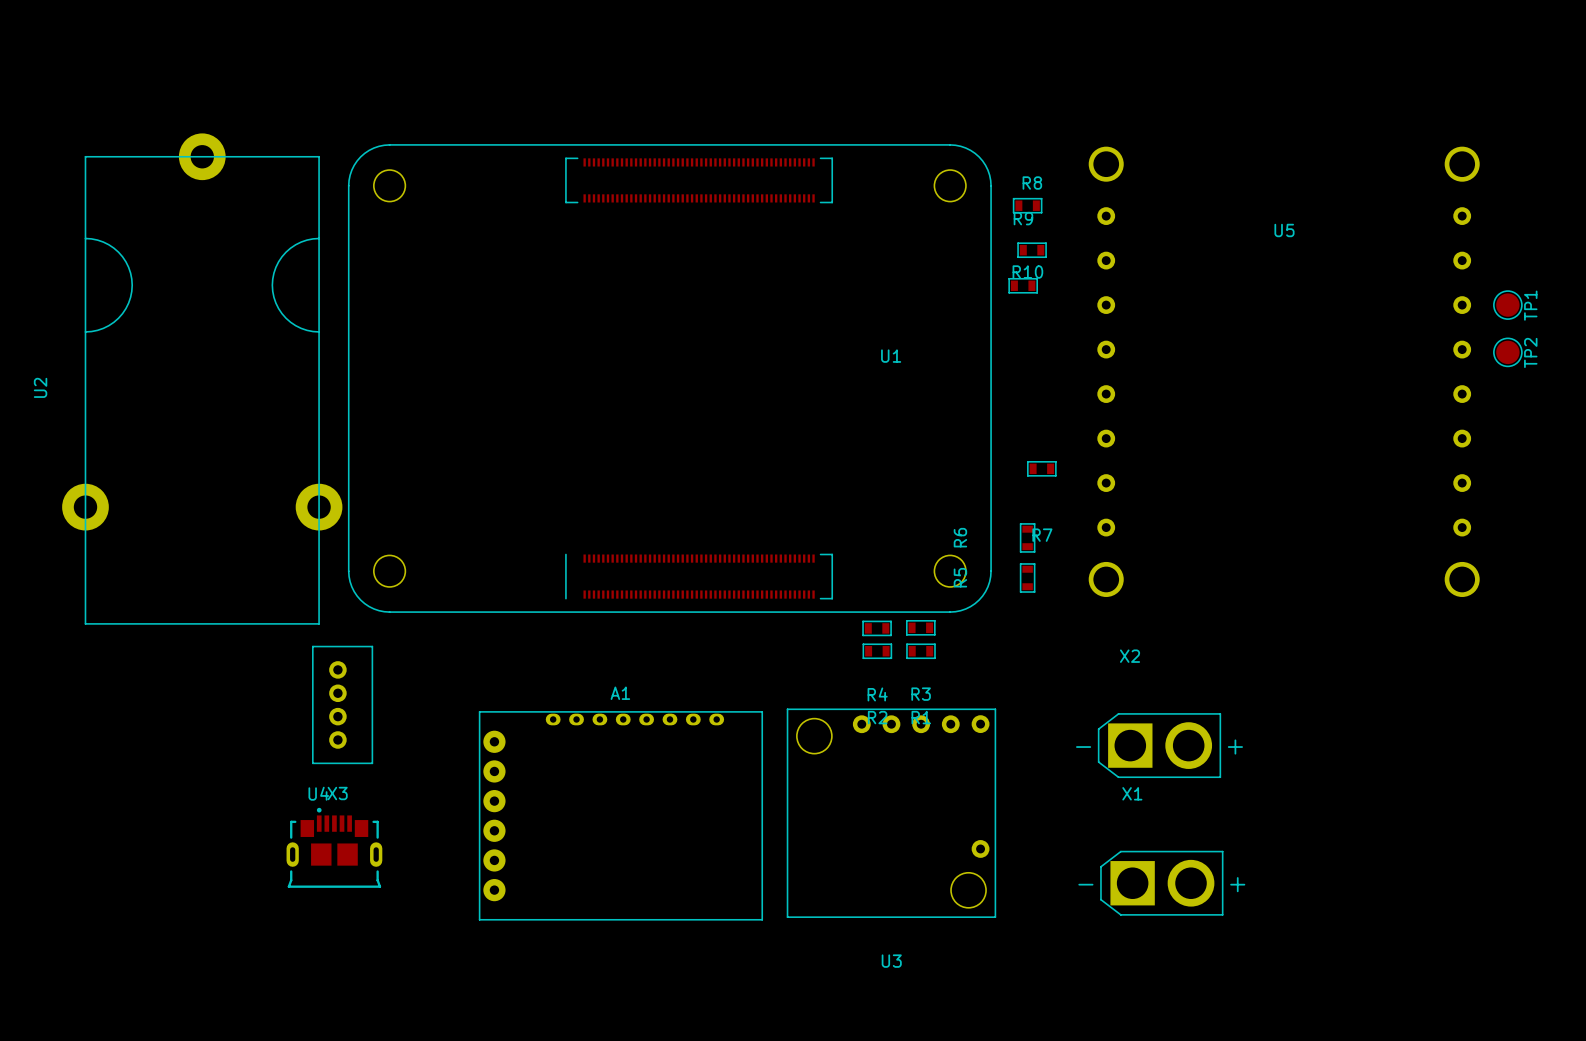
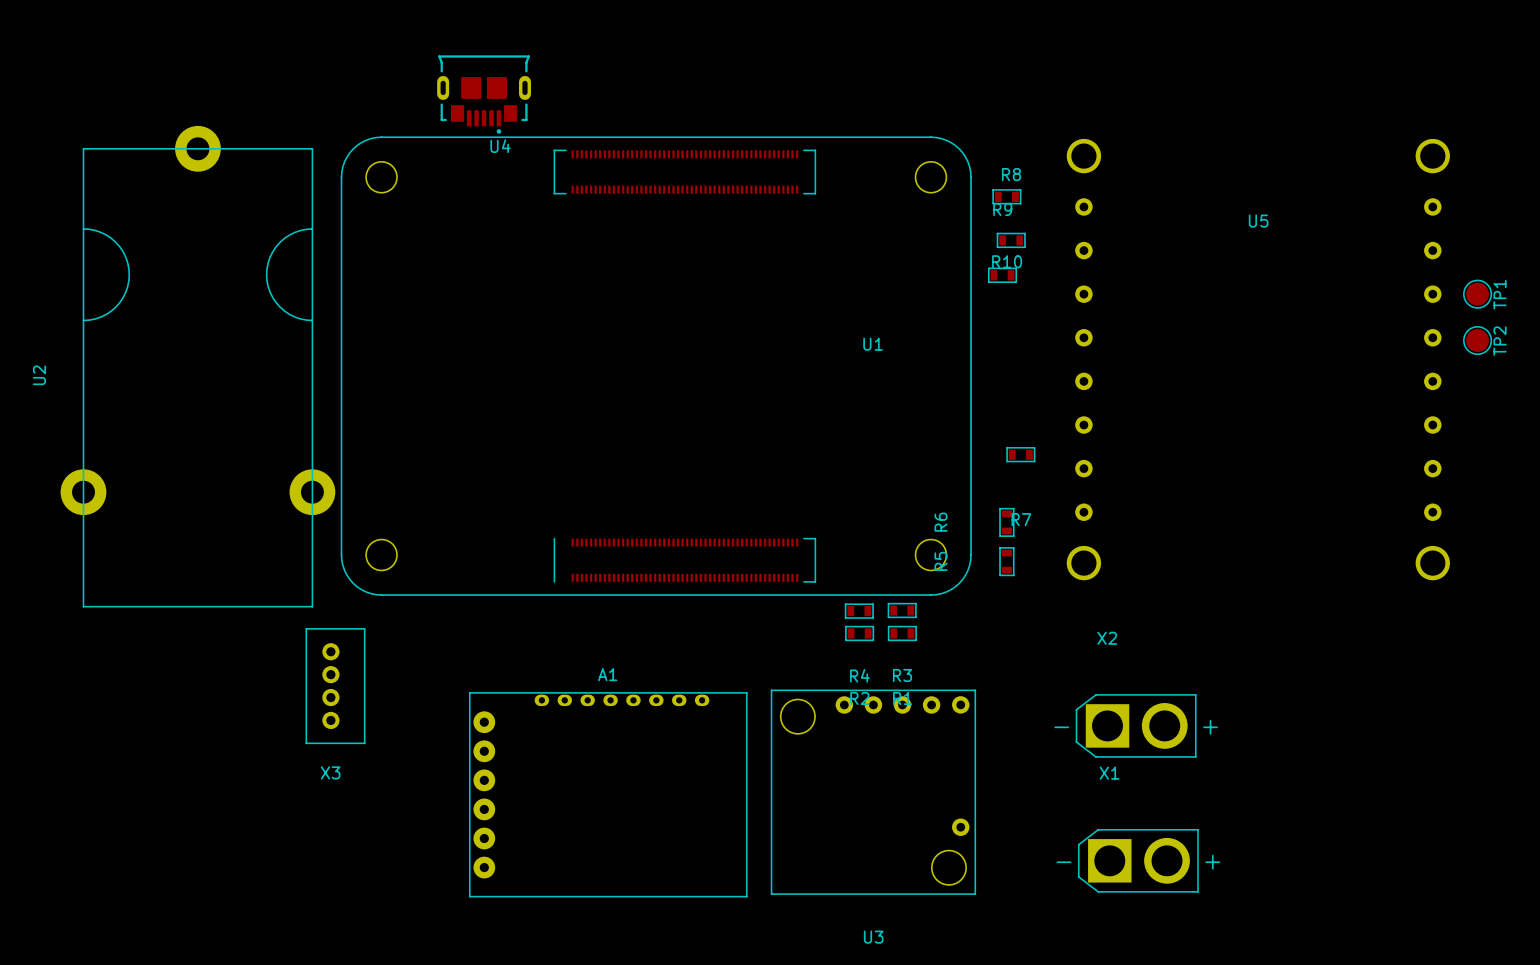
U4 rotation: 0° (334, 847) -> 180° (484, 94)
U4 position: (334, 847) -> (484, 94)

